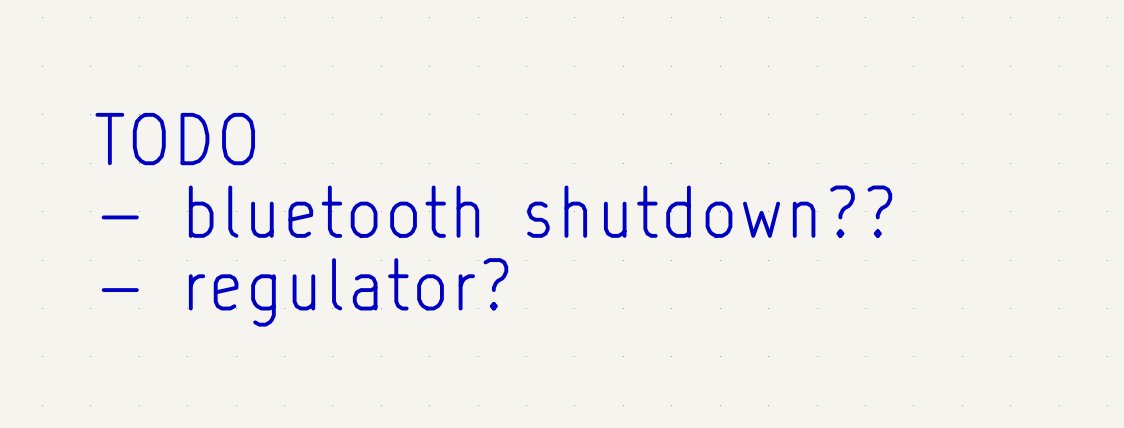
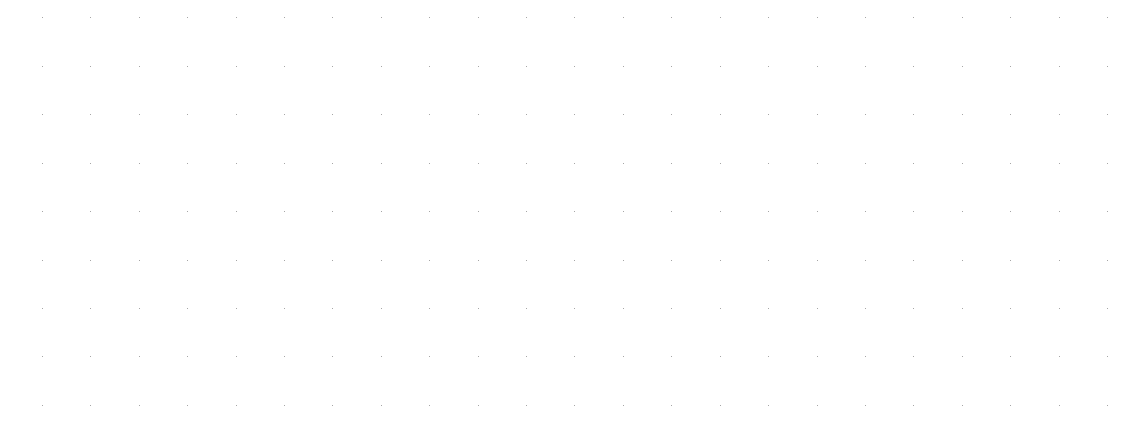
text: TODO (175, 139) -> none
text: - bluetooth shutdown?? (496, 211) -> none
text: - regulator? (304, 292) -> none

